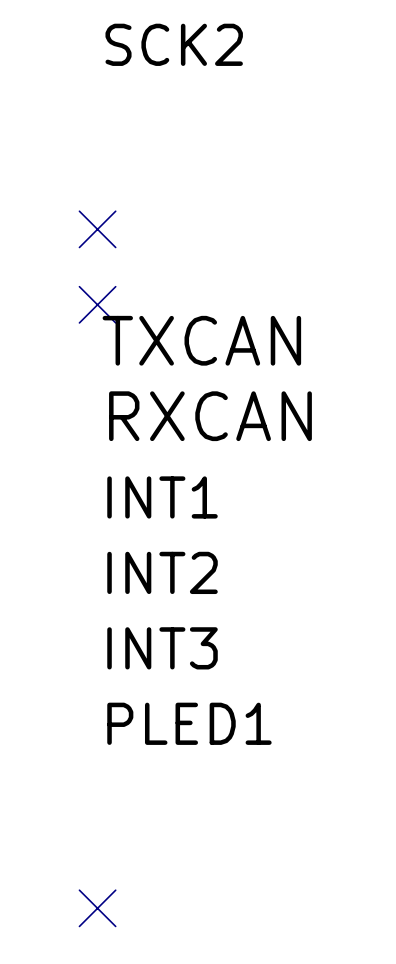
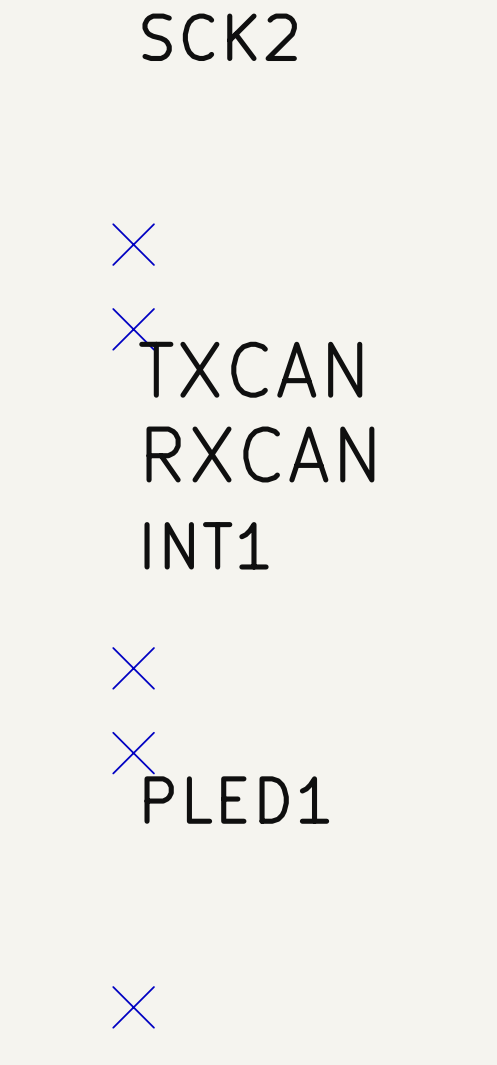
label: INT2 (162, 572) -> none
no-connect mark: none -> (133, 668)
label: INT3 (162, 648) -> none
no-connect mark: none -> (133, 753)

